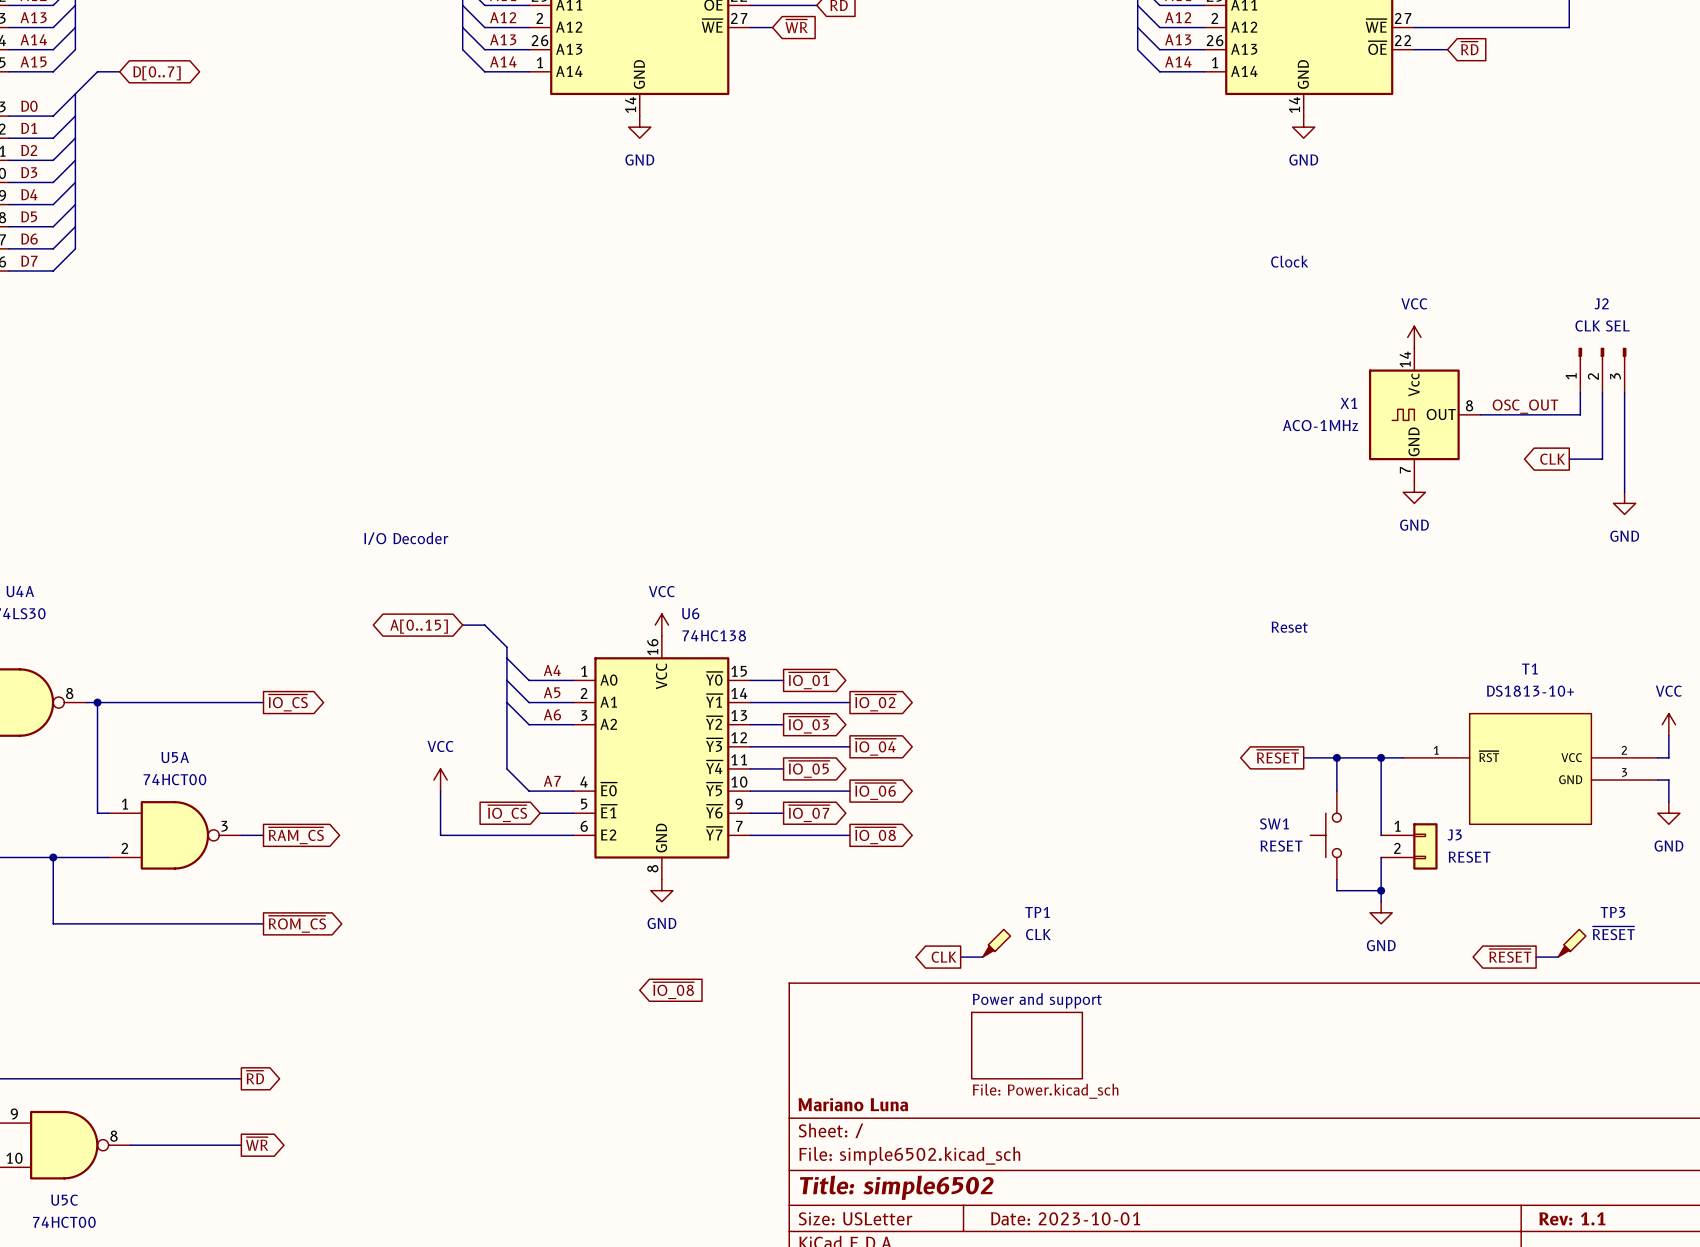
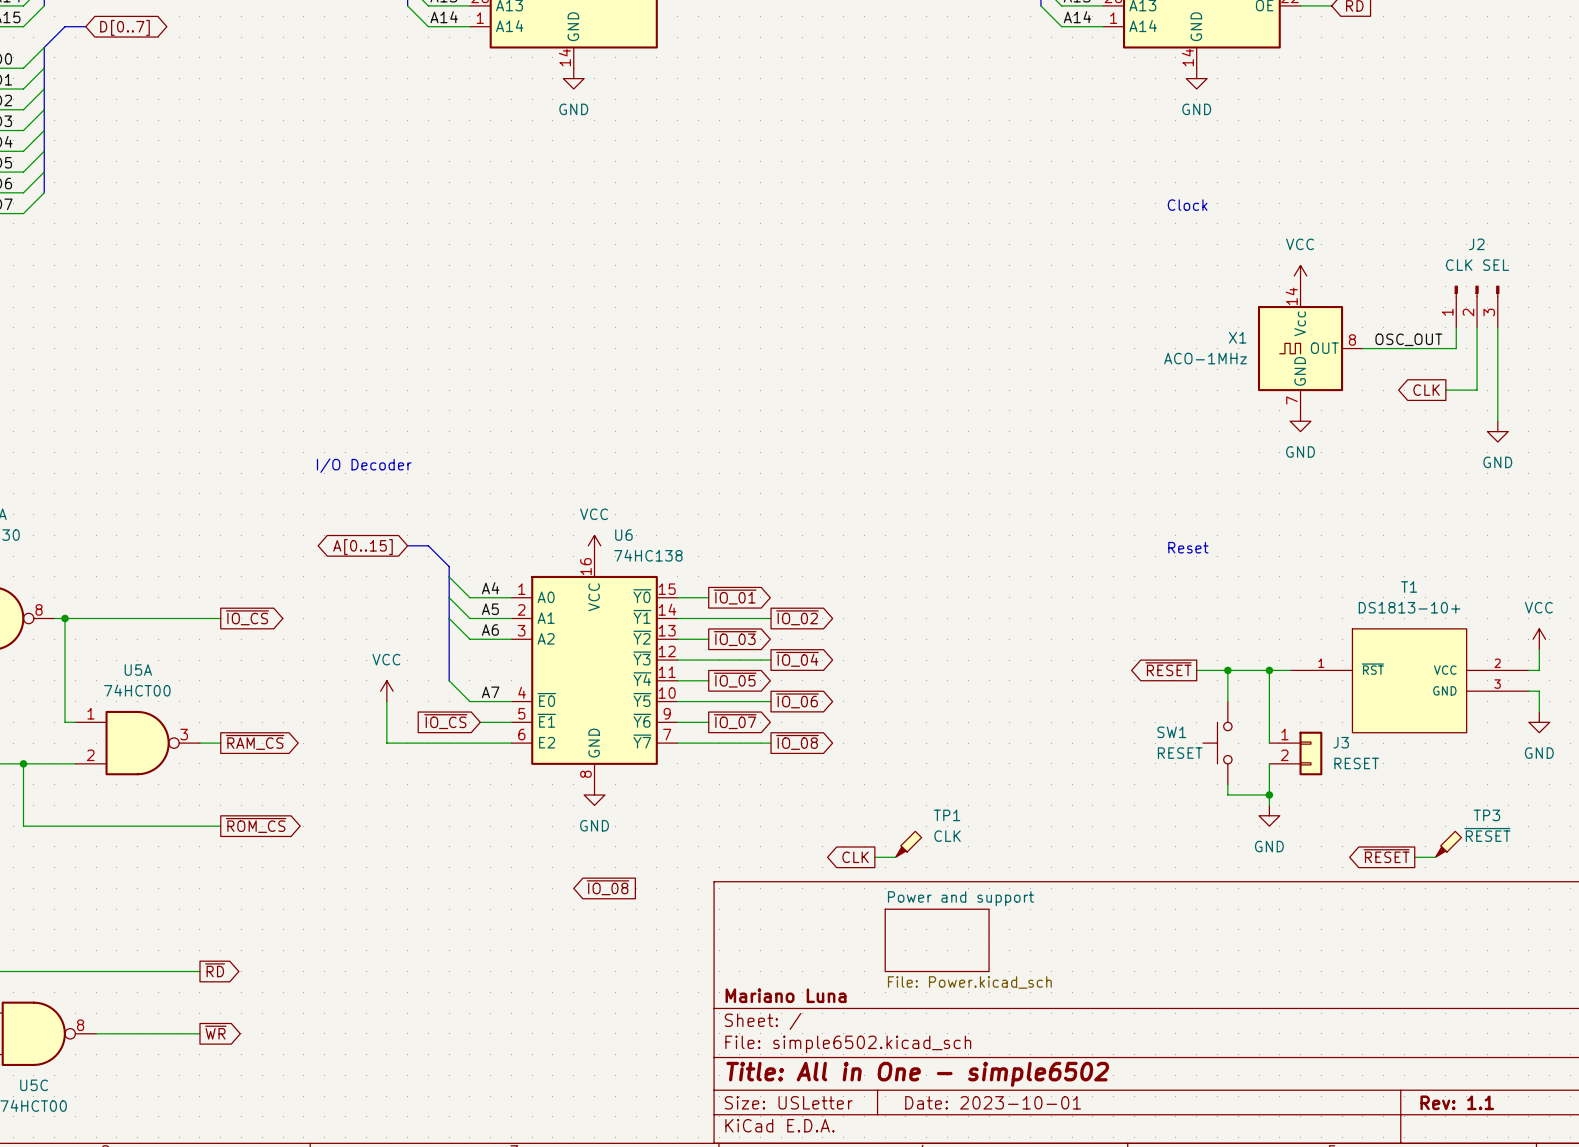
title block: Title: simple6502 (896, 1187) -> Title: All in One - simple6502 (917, 1074)

